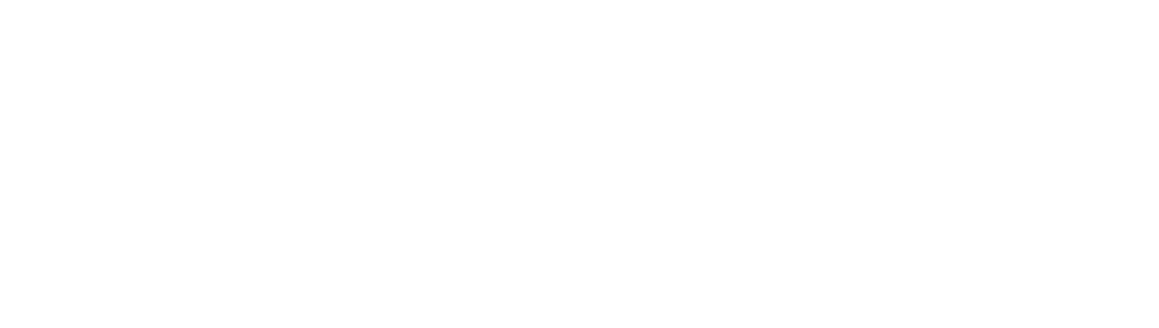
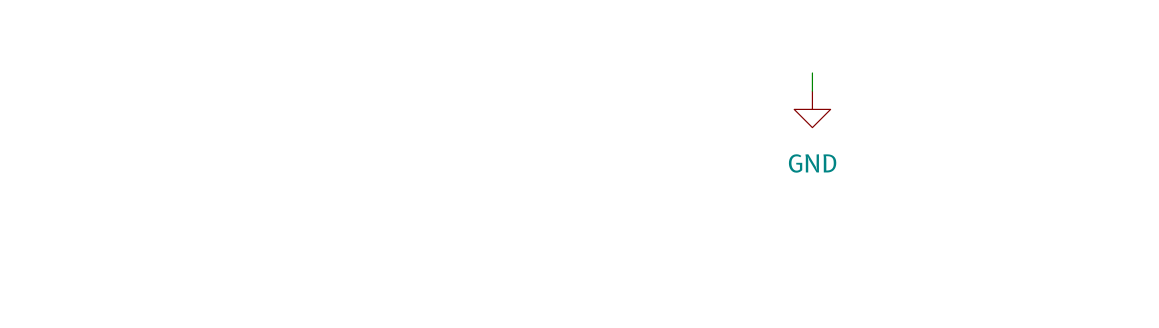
wire: none -> (812, 72) (812, 91)
power symbol: none -> GND (812, 109)

